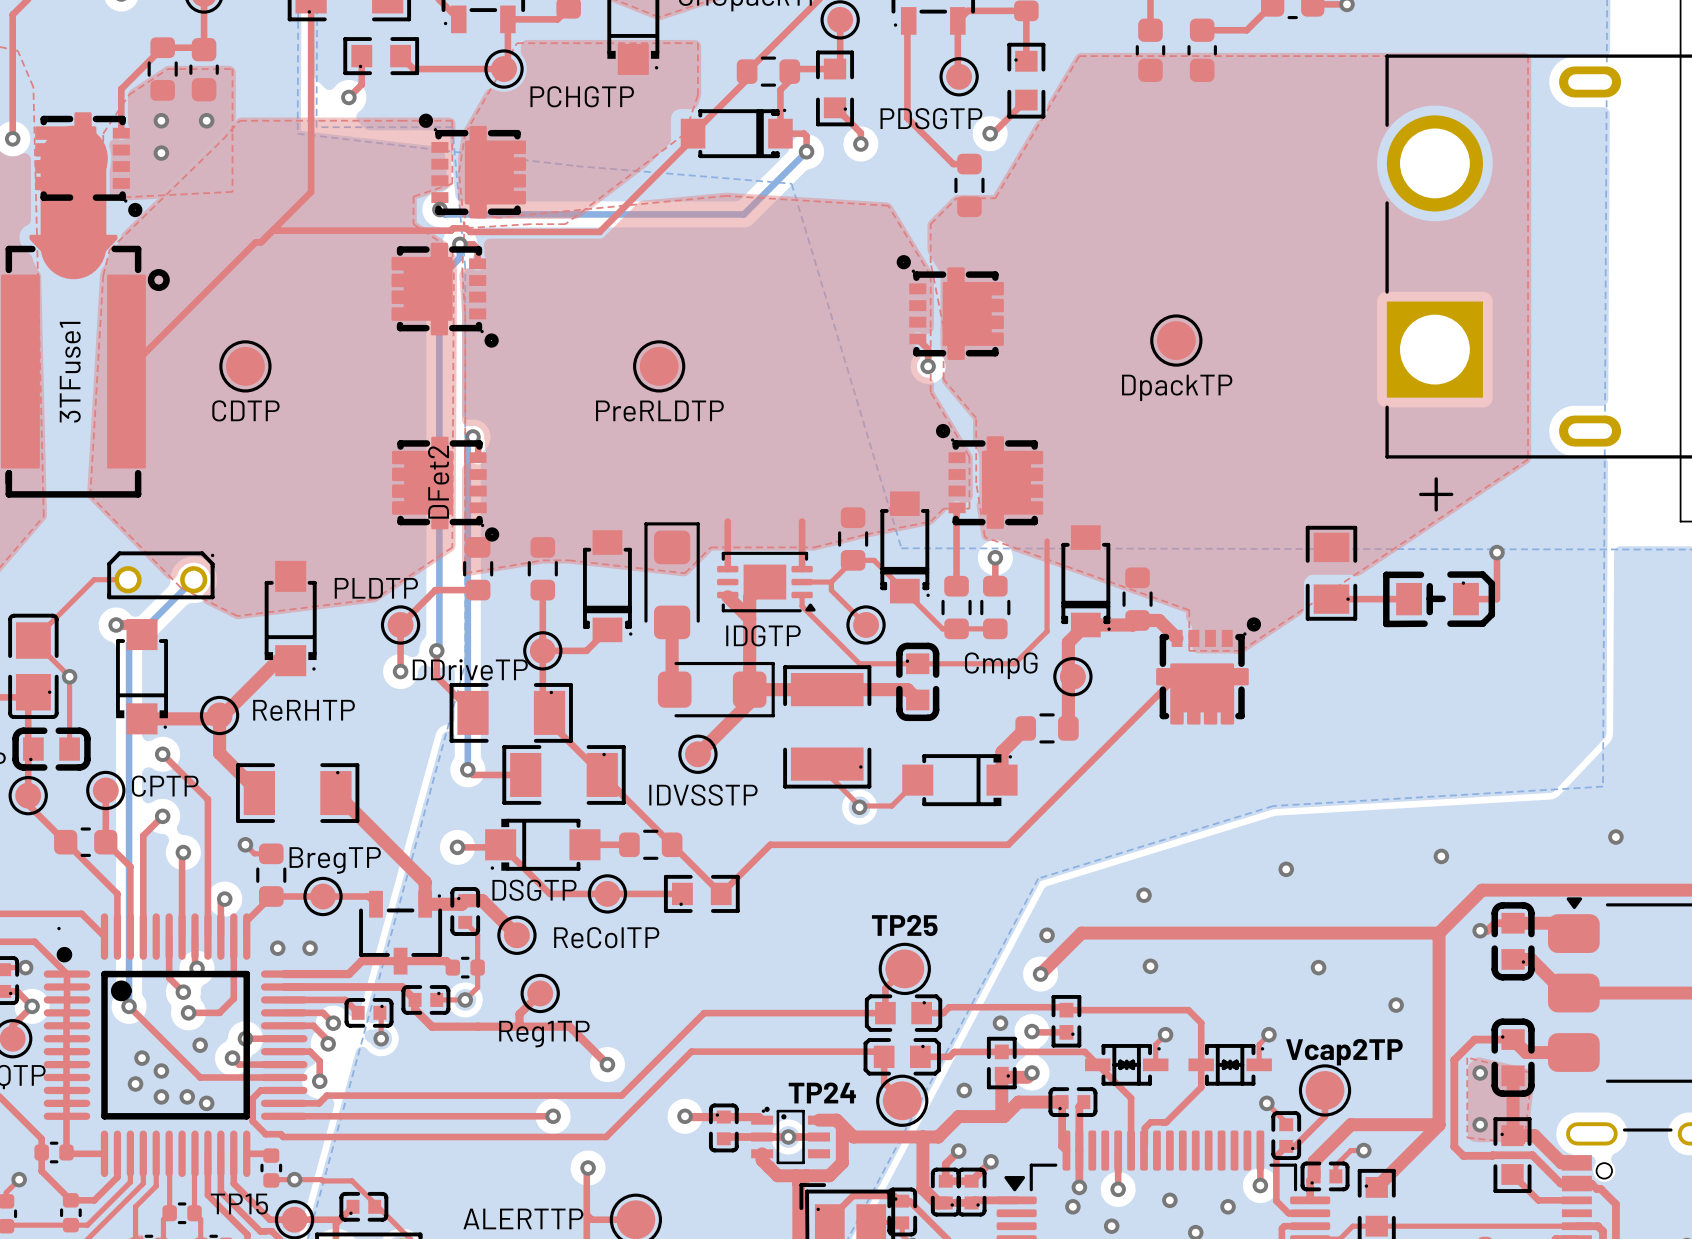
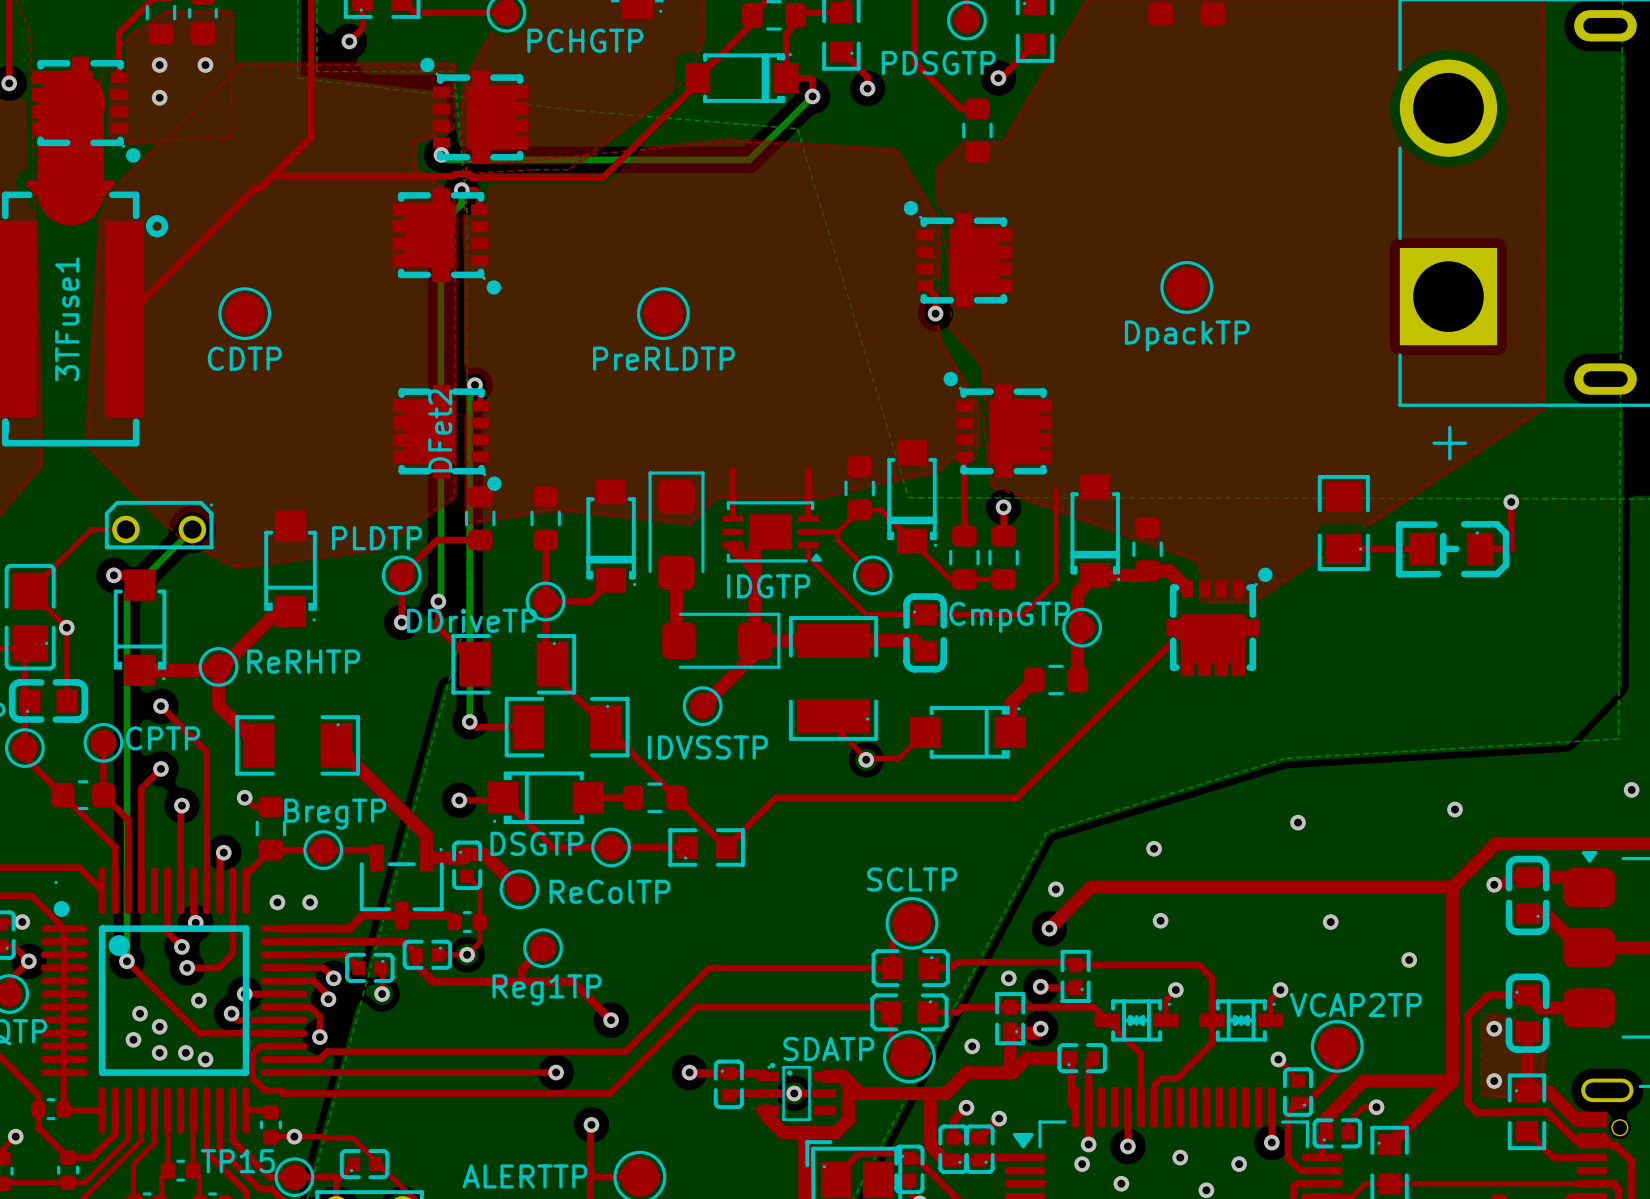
part value: CmpG (1001, 665) -> CmpGTP (1009, 617)
TP25 name: TP25 (904, 925) -> SCLTP (912, 879)
part value: Vcap2TP (1344, 1052) -> VCAP2TP (1355, 1005)
TP24 name: TP24 (822, 1092) -> SDATP (828, 1049)

